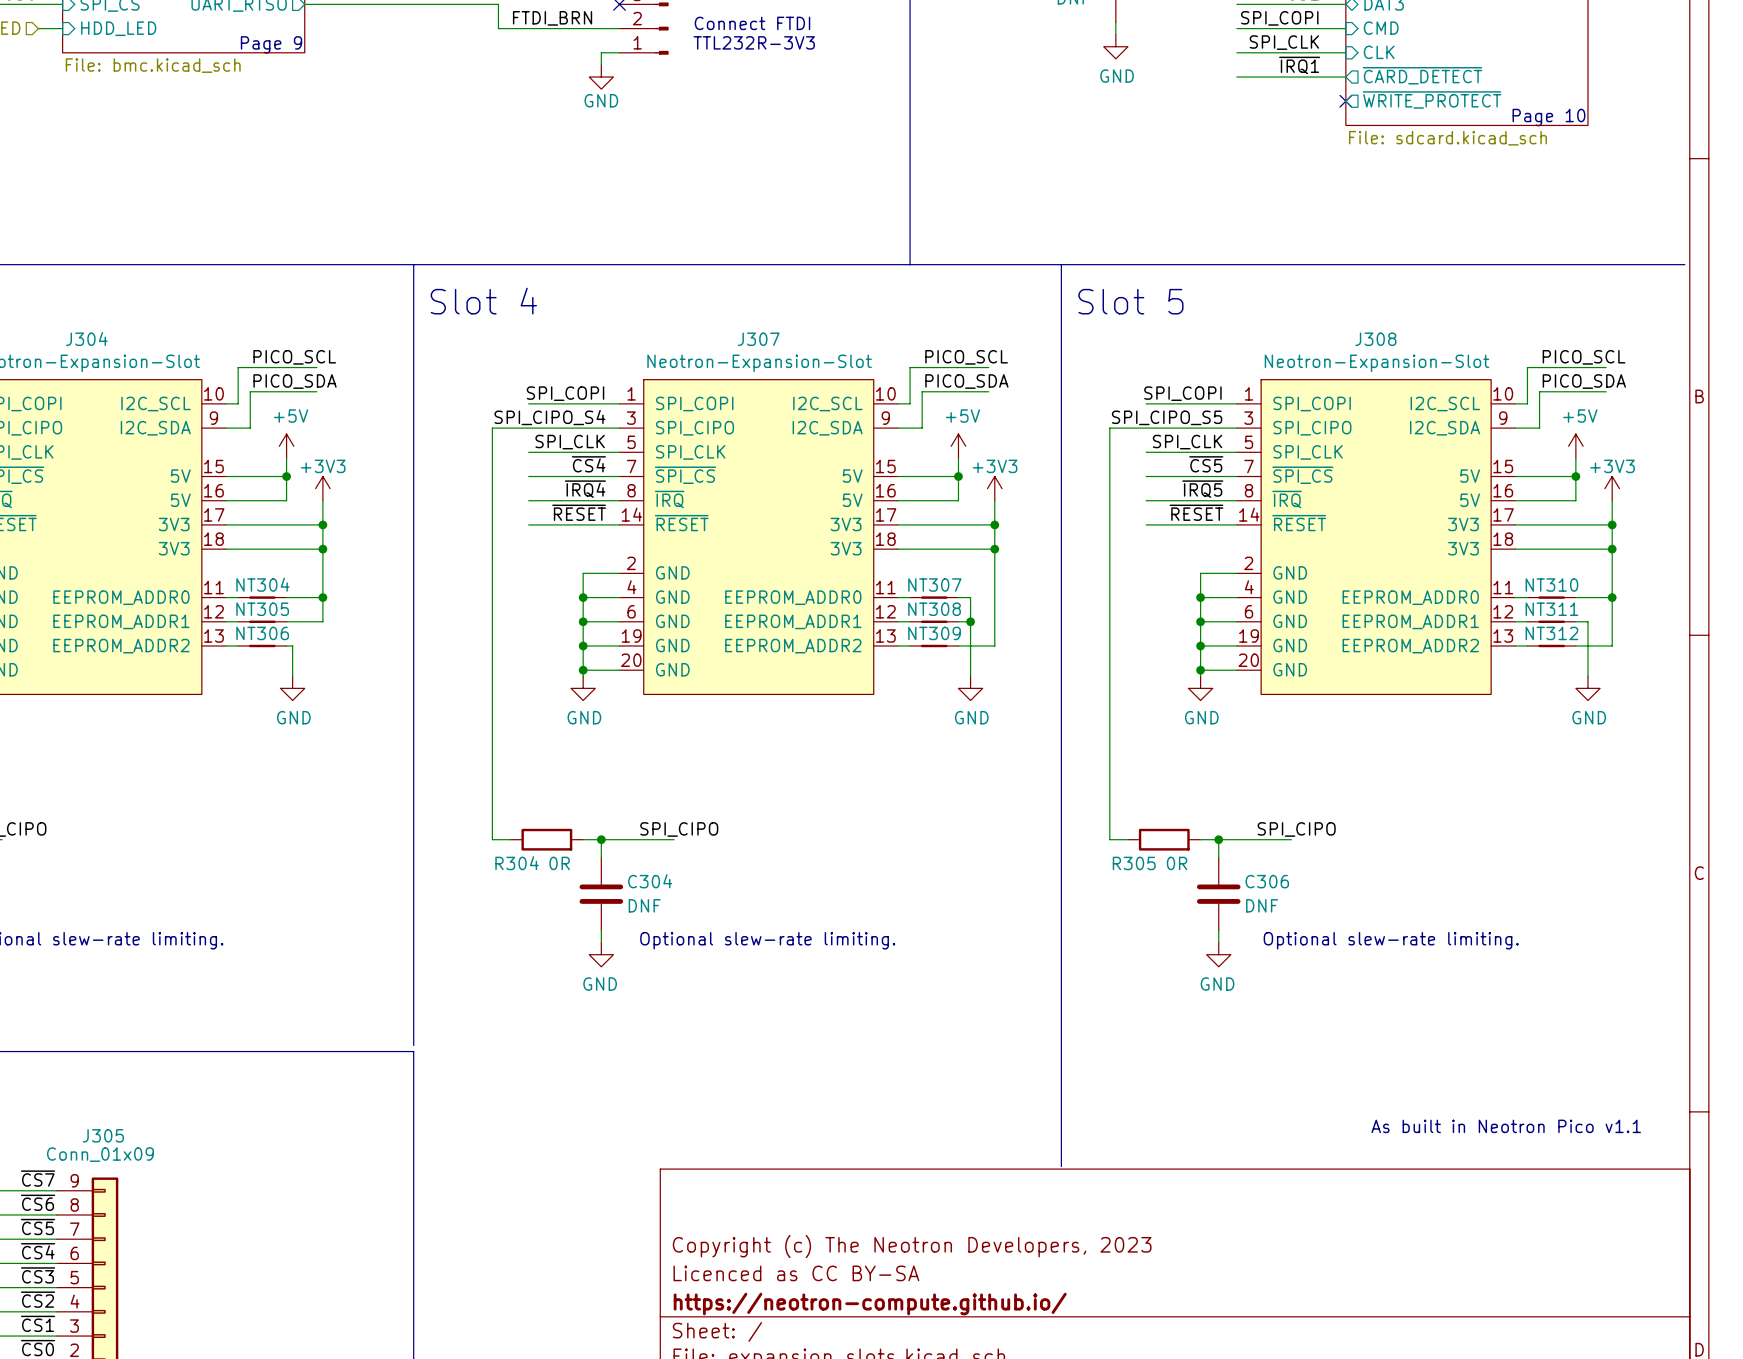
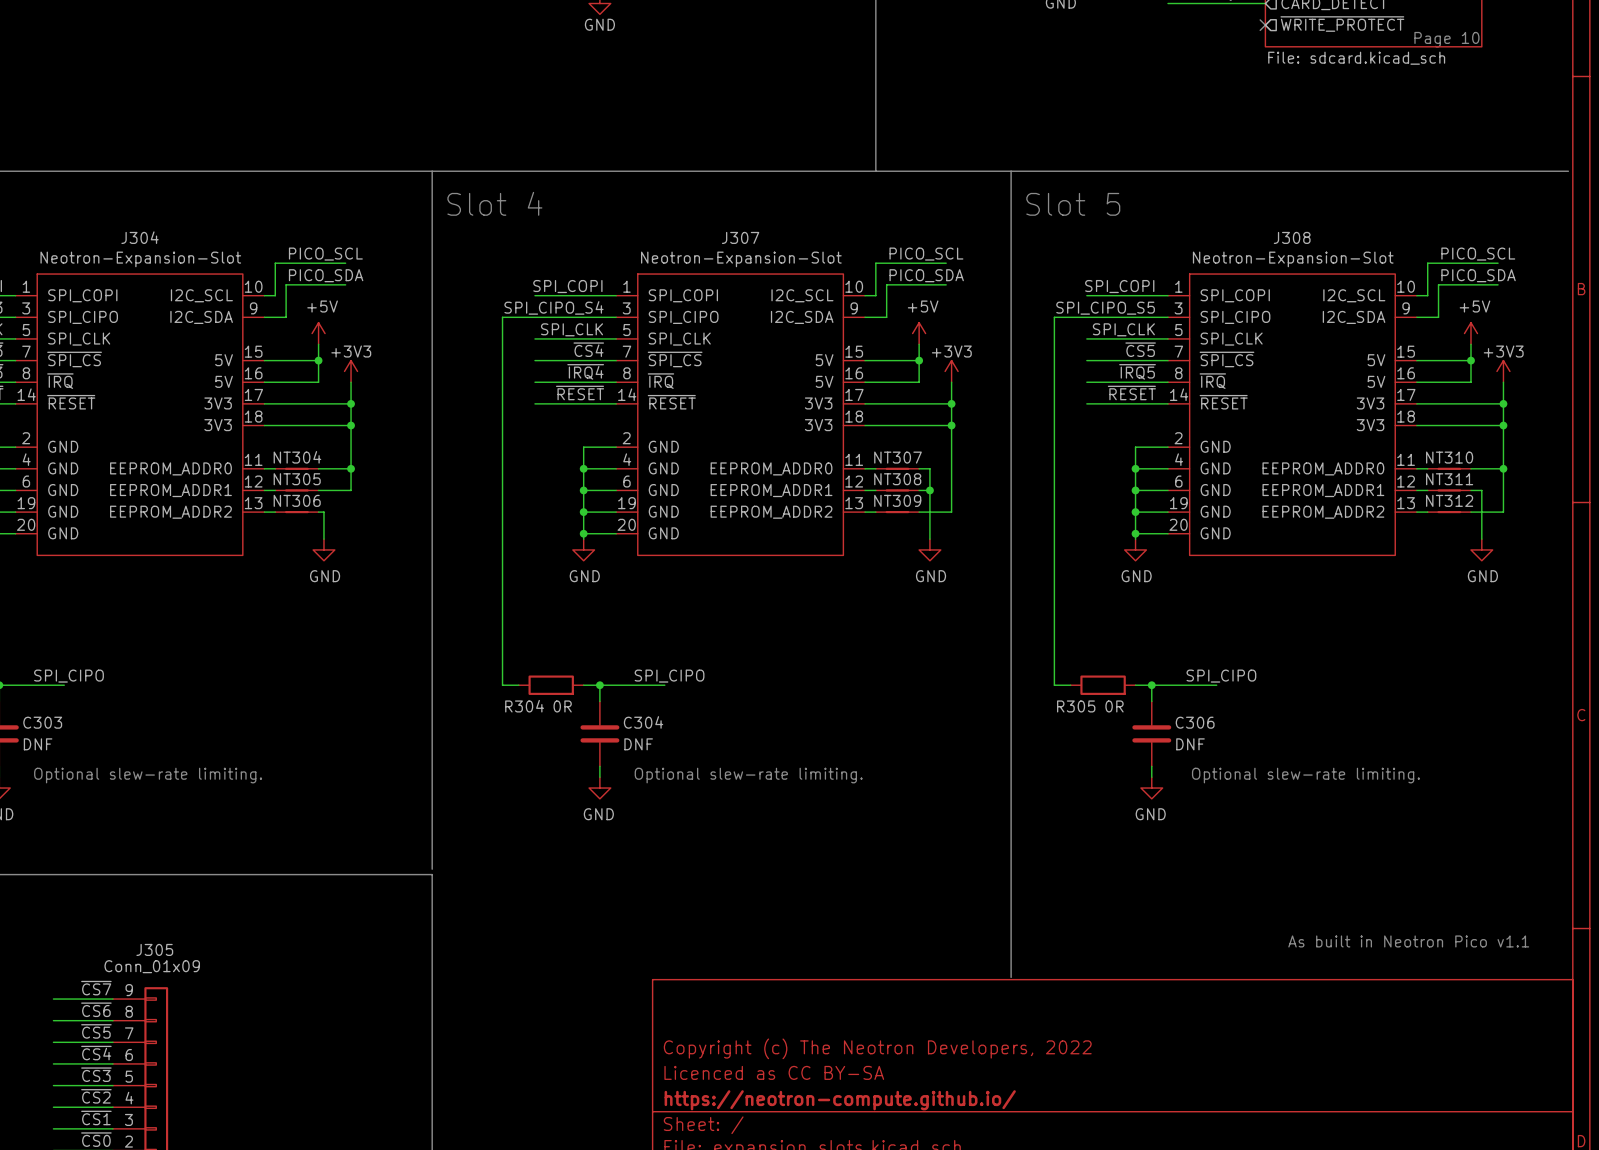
title block: Copyright (c) The Neotron Developers, 2023 (912, 1246) -> Copyright (c) The Neotron Developers, 2022 (877, 1048)

